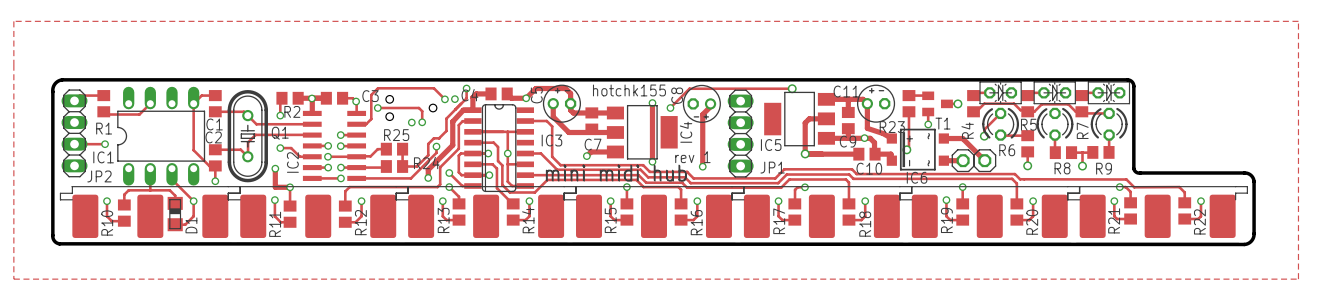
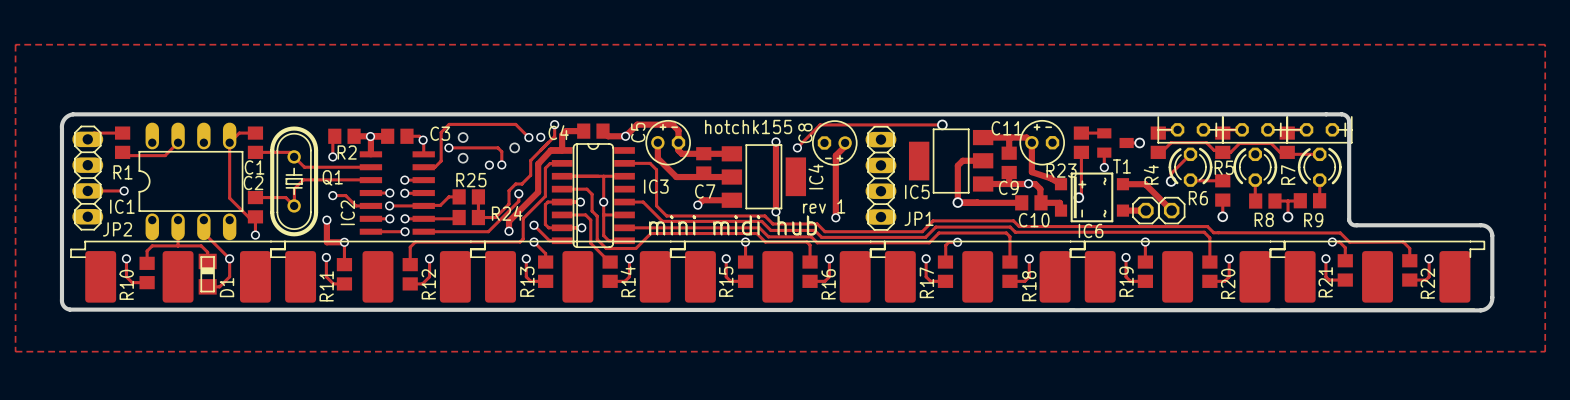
part footprint: [979, 81, 1022, 105] -> [1157, 116, 1224, 144]
part footprint: [1033, 81, 1076, 105] -> [1222, 116, 1288, 144]
part footprint: [1087, 81, 1131, 105] -> [1286, 116, 1353, 144]

